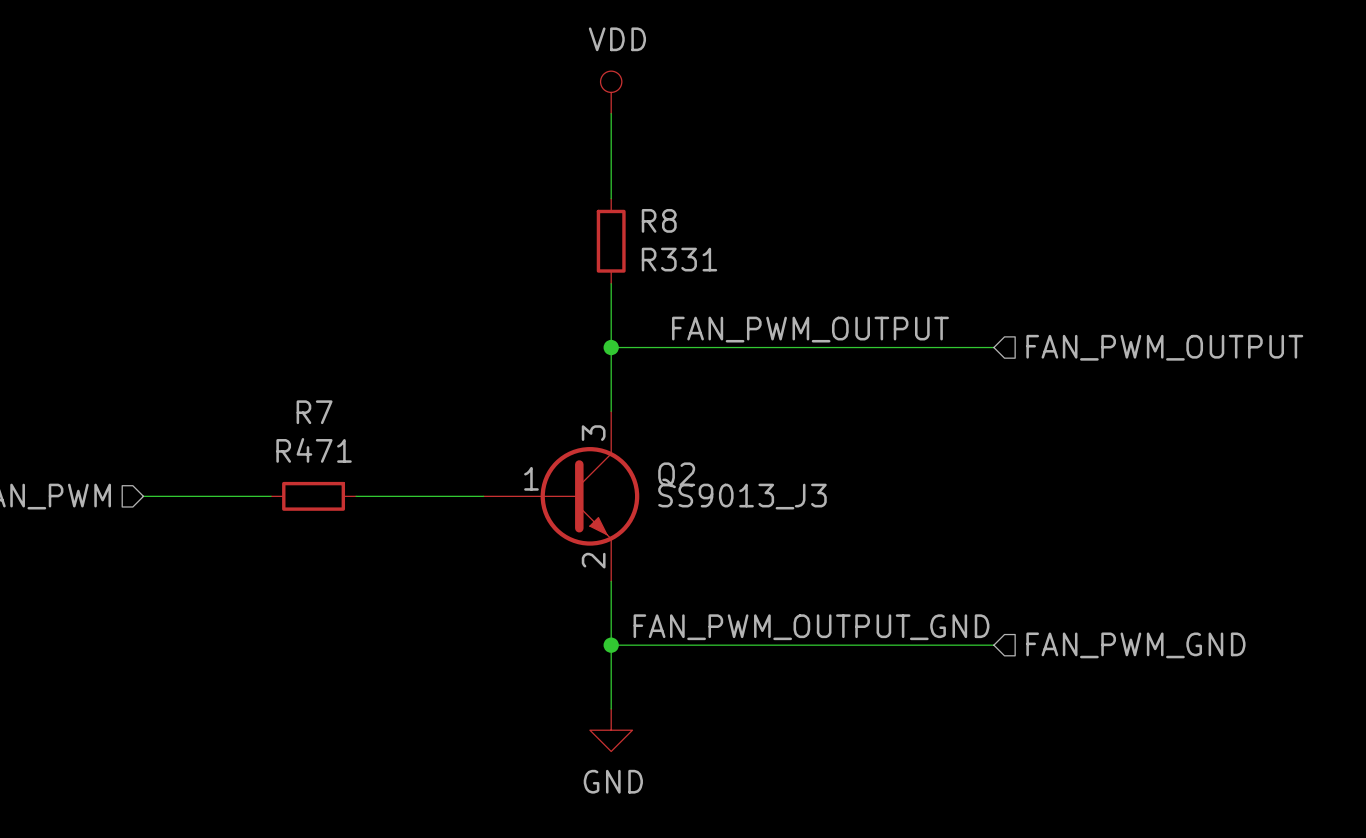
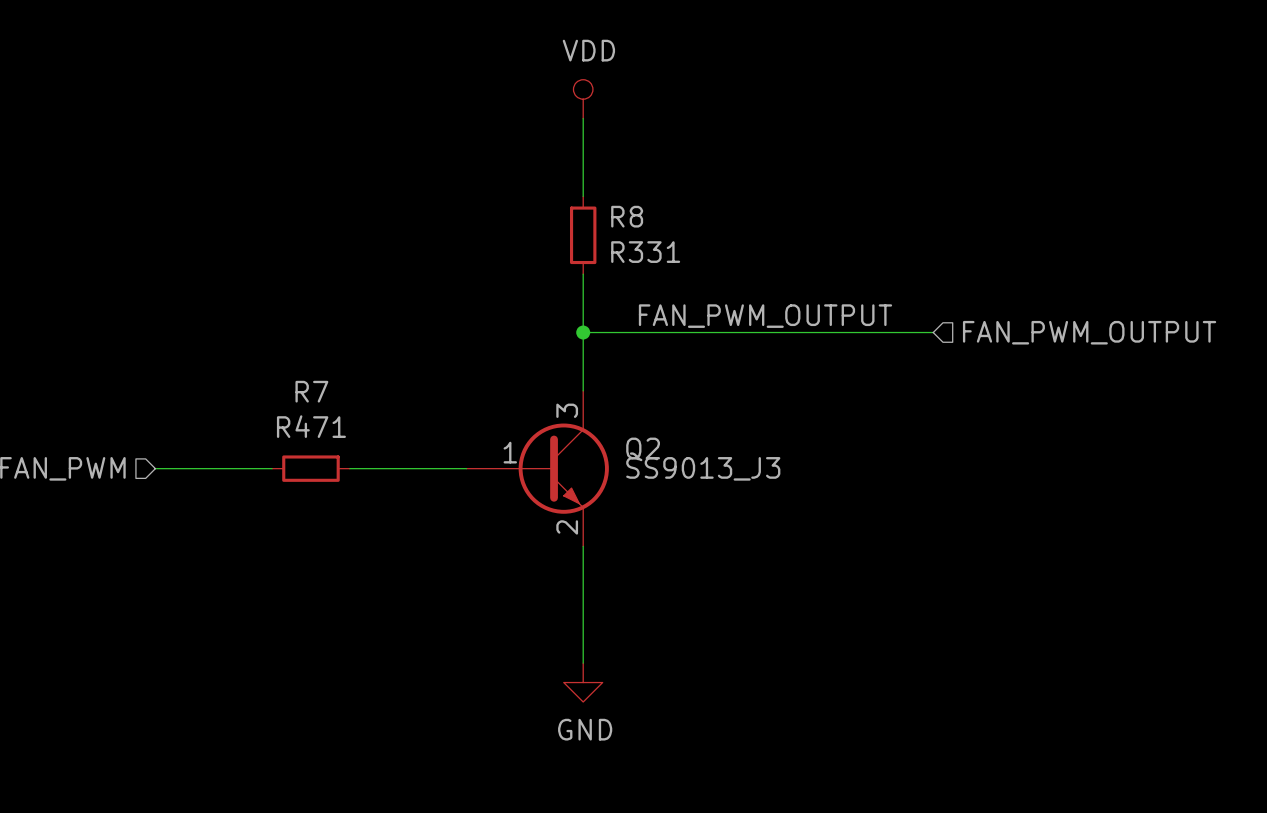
label: FAN_PWM_OUTPUT_GND (811, 627) -> none
wire: (611, 645) (993, 645) -> none
junction: (611, 645) -> none
hierarchical label: FAN_PWM_GND (1135, 645) -> none

